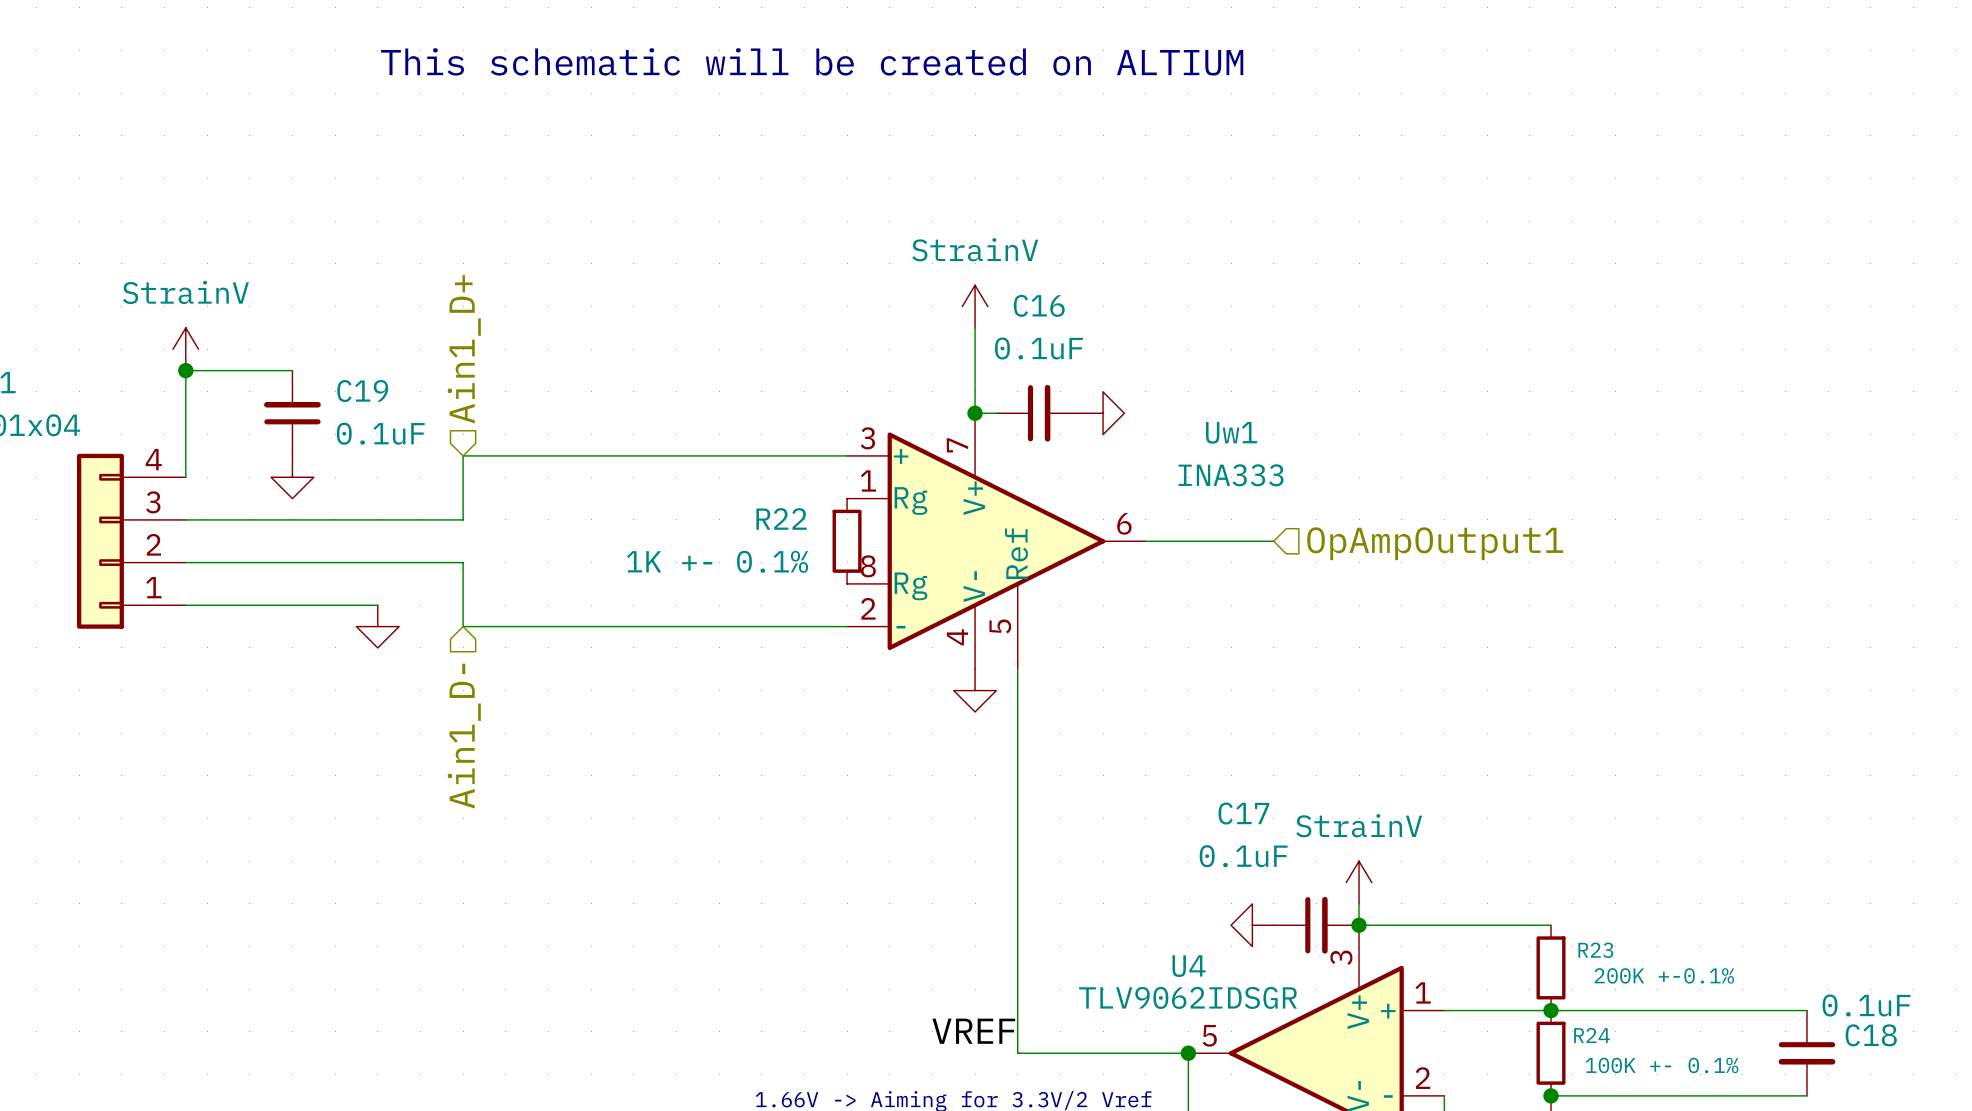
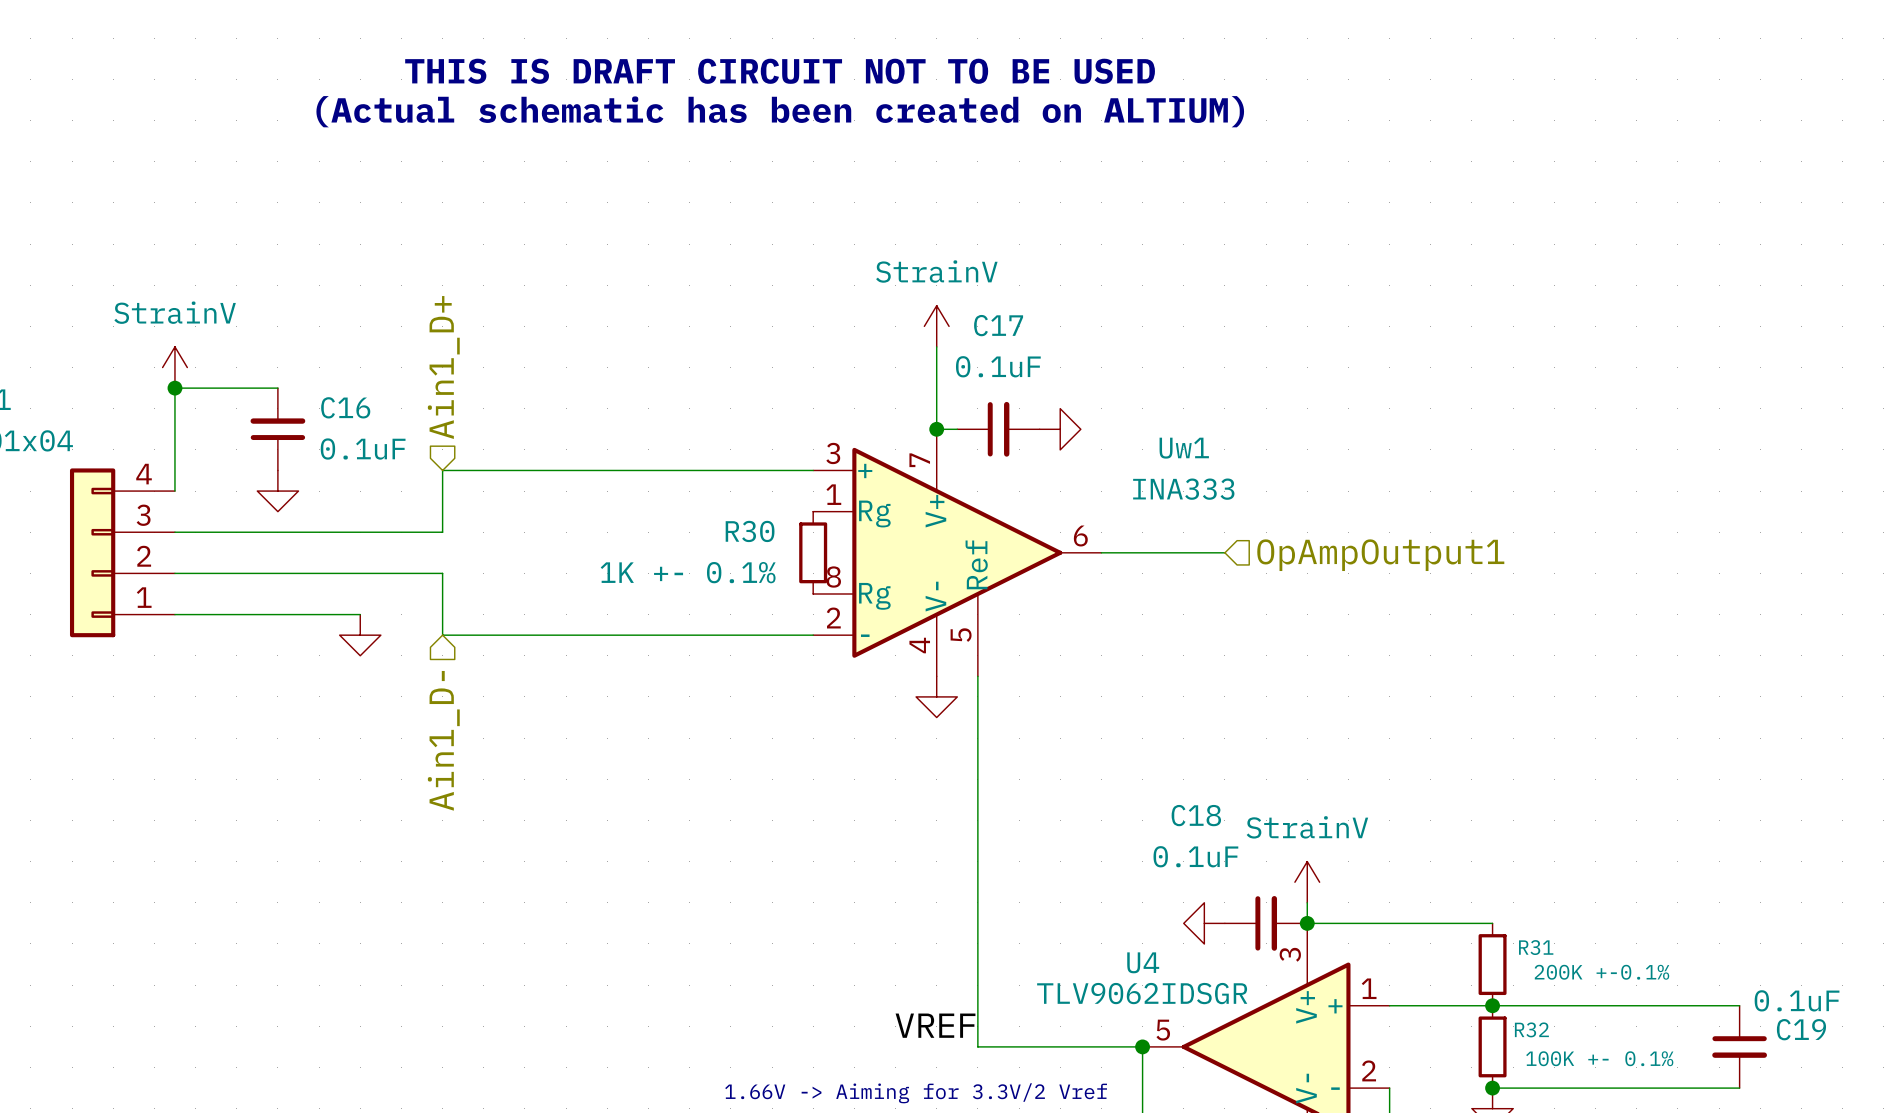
text: none -> THIS IS DRAFT CIRCUIT NOT TO BE USED (780, 71)
text: This schematic will be created on ALTIUM (812, 61) -> (Actual schematic has been created on ALTIUM) (780, 111)
C16 name: C16 (1039, 305) -> C17 (998, 325)
C19 name: C19 (362, 391) -> C16 (345, 407)
R22 name: R22 (781, 518) -> R30 (750, 531)
C17 name: C17 (1243, 813) -> C18 (1196, 815)
R23 name: R23 (1595, 950) -> R31 (1536, 947)
R24 name: R24 (1592, 1035) -> R32 (1531, 1029)
C18 name: C18 (1871, 1035) -> C19 (1801, 1029)

